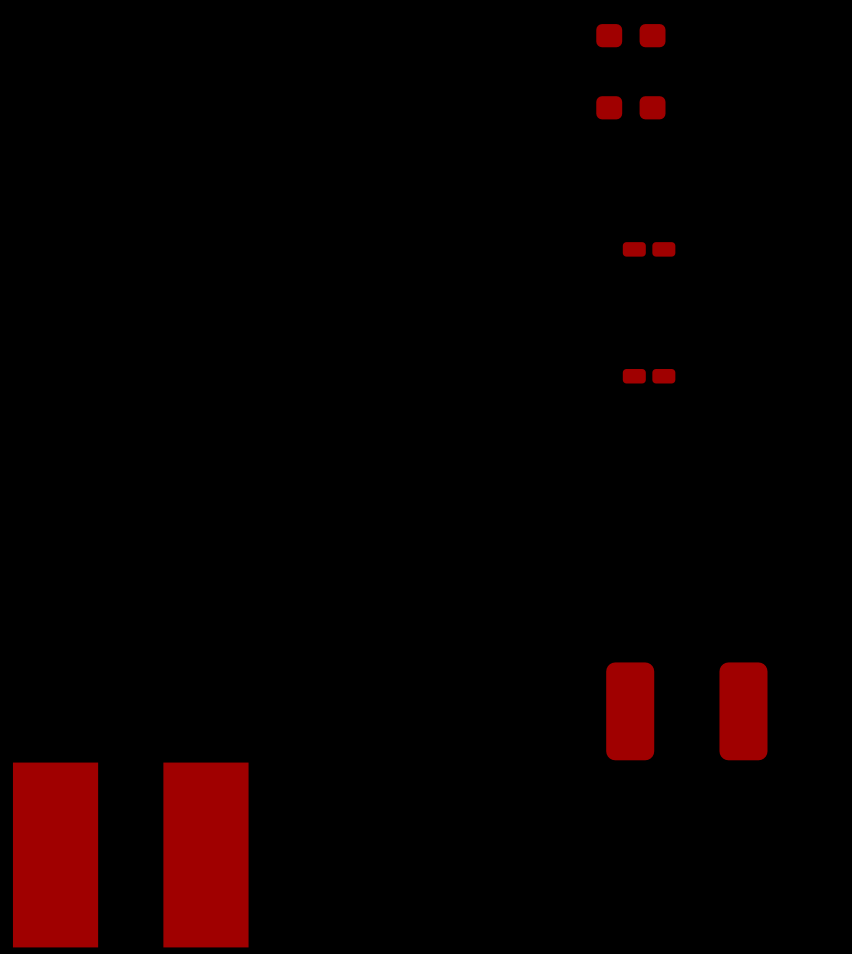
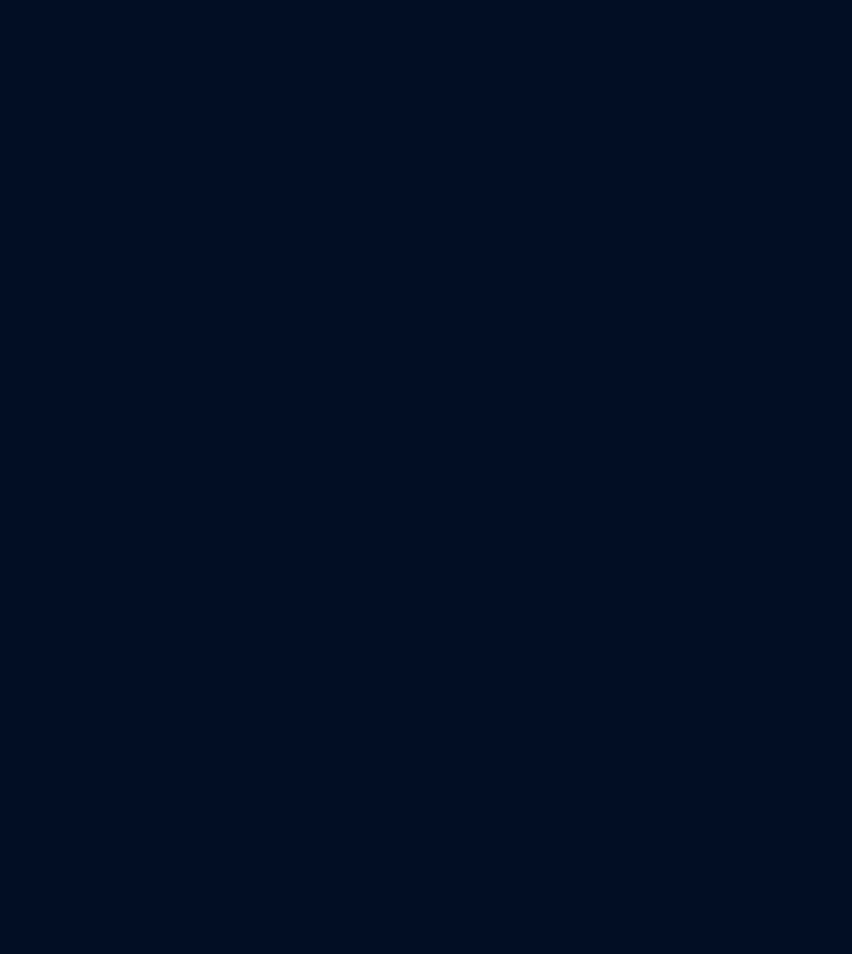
part: (630, 35) -> none
part: (630, 107) -> none
part: (649, 249) -> none
part: (649, 376) -> none
part: (686, 711) -> none
part: (130, 854) -> none

